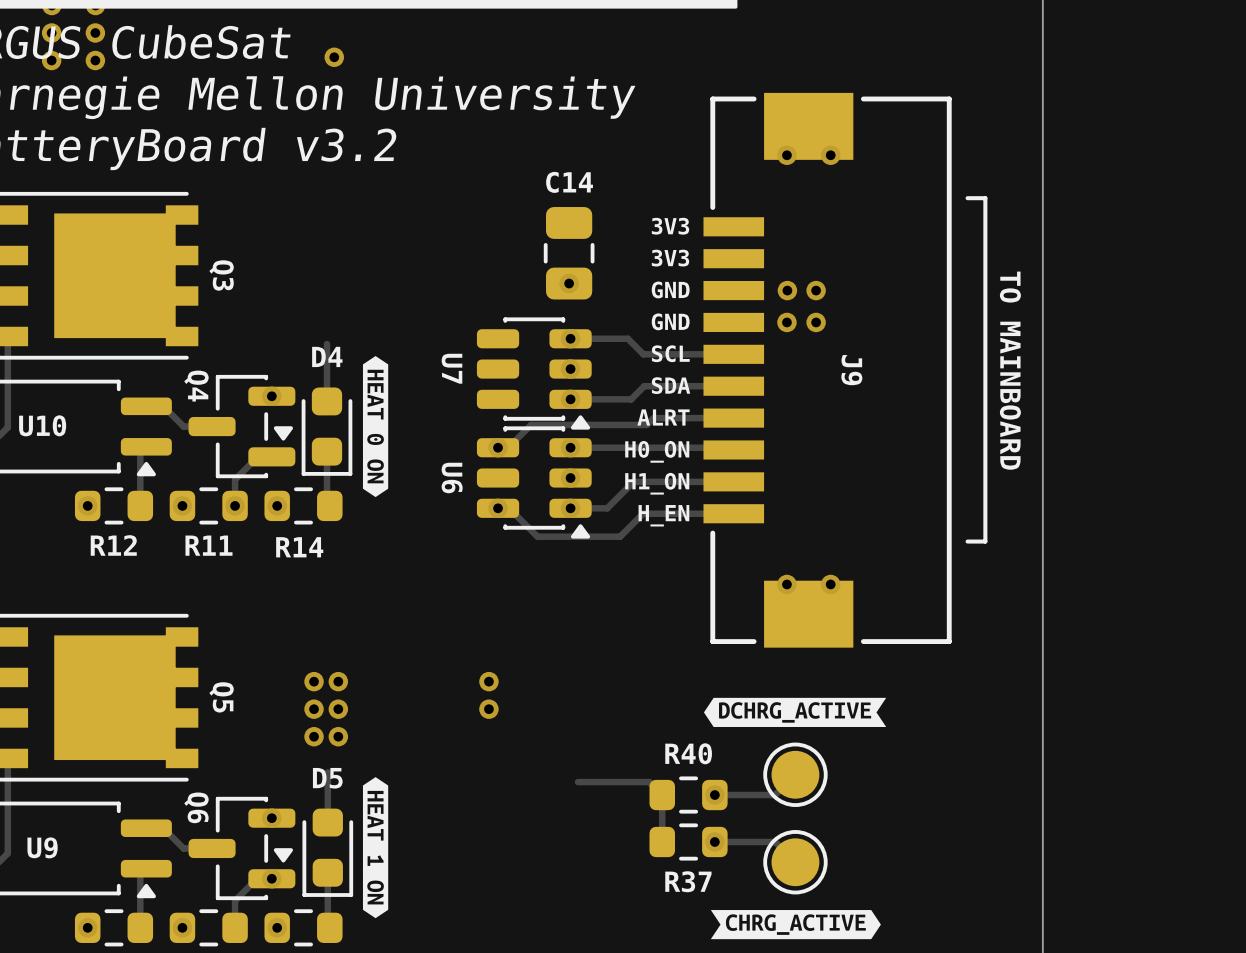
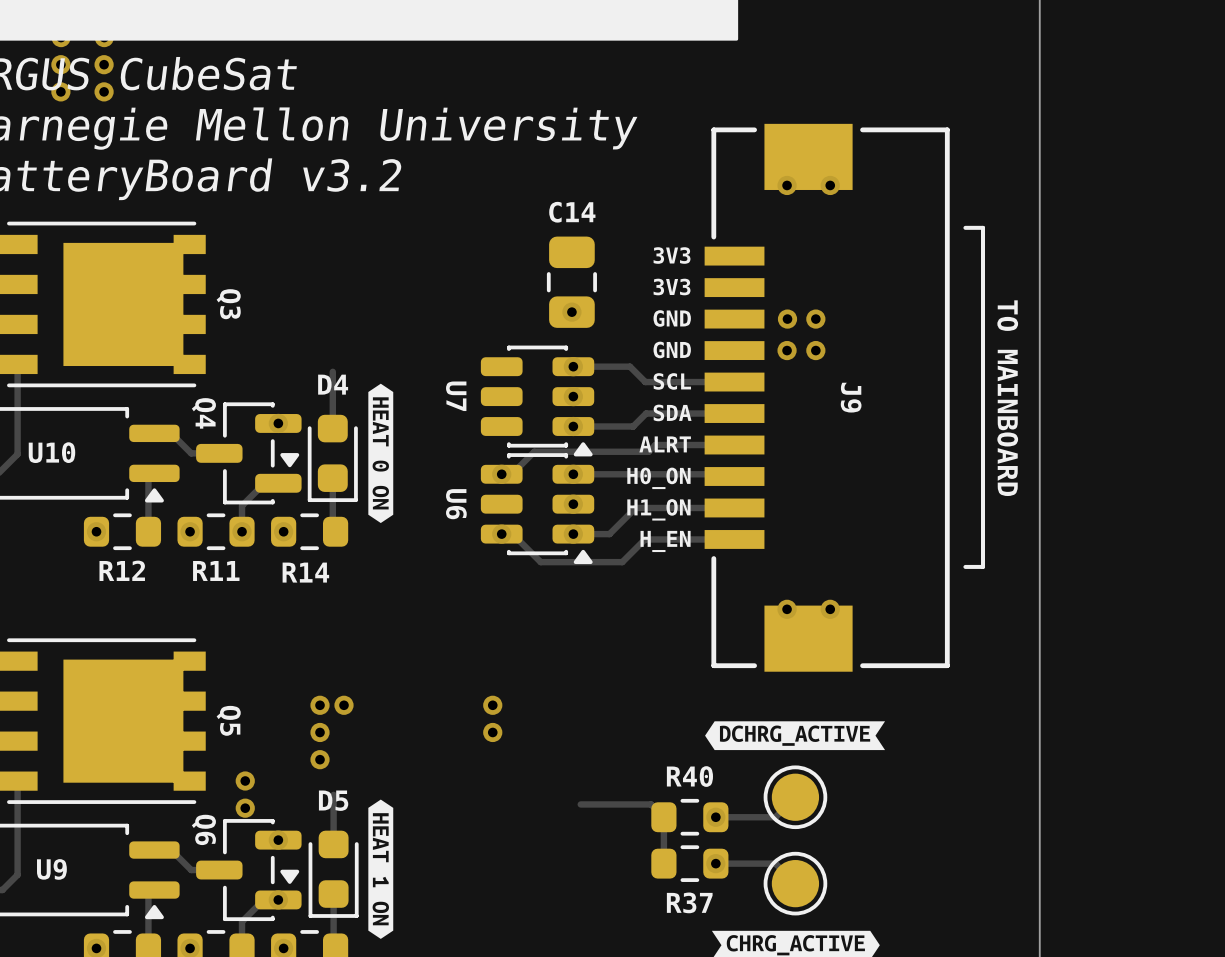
via: (334, 57) -> none
via: (338, 709) -> none
via: (338, 736) -> none
via: none -> (245, 780)
via: none -> (245, 808)

